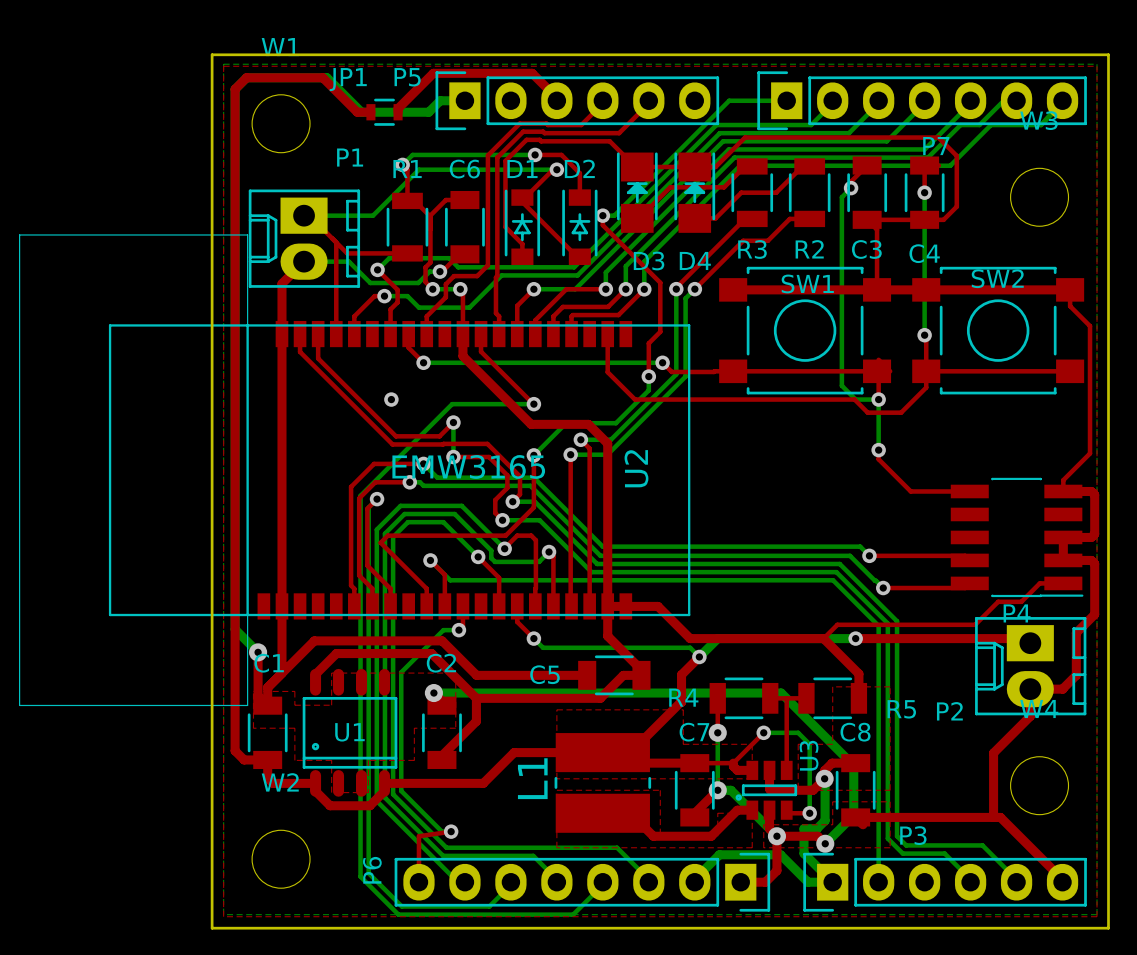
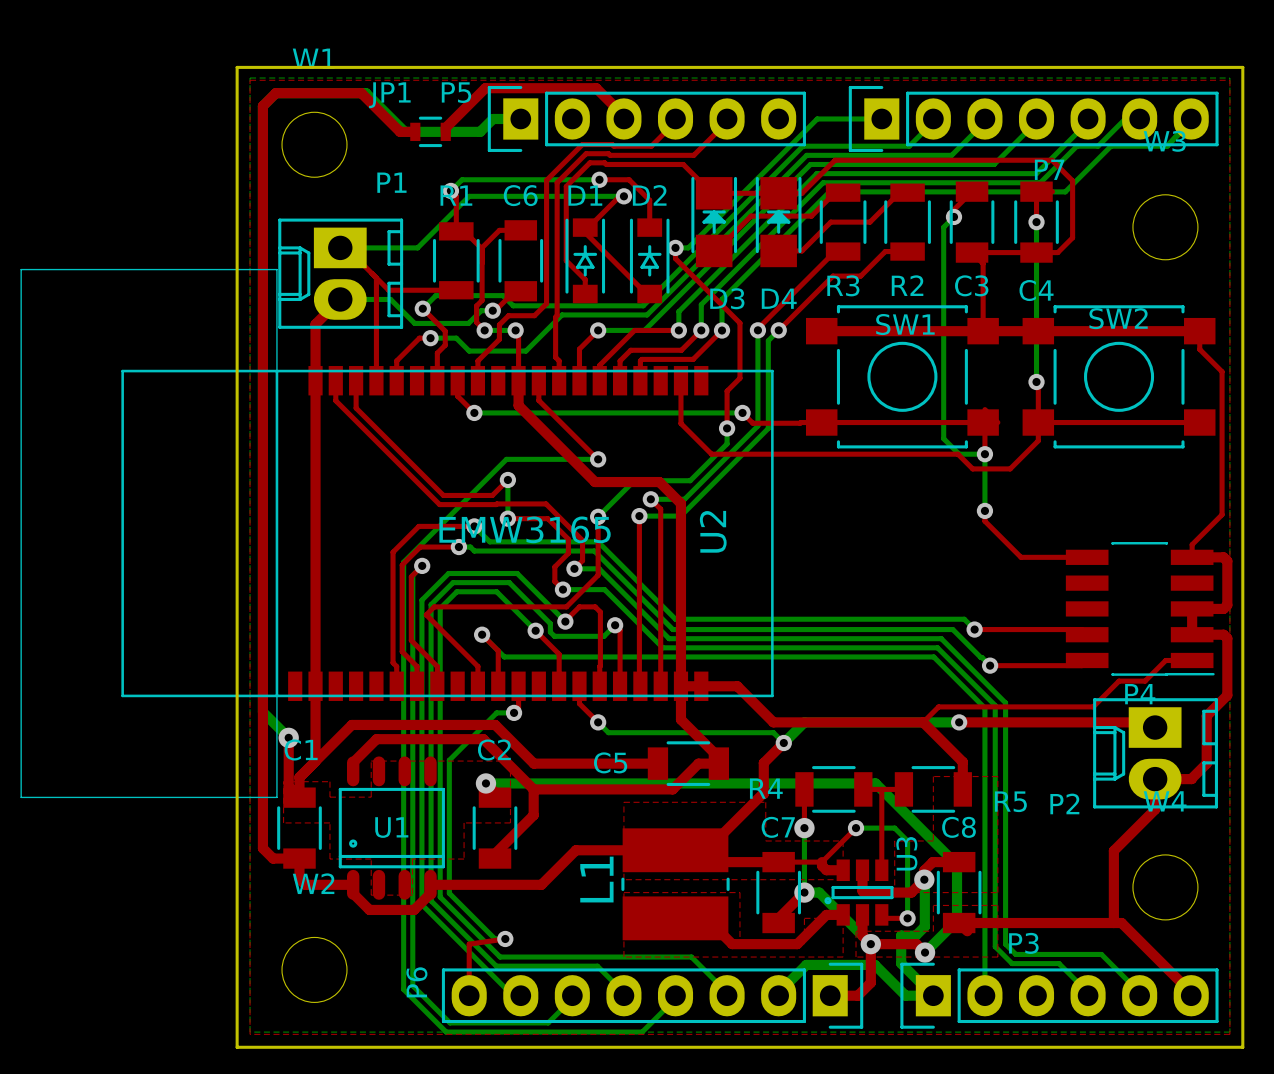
via: (391, 399) -> none

